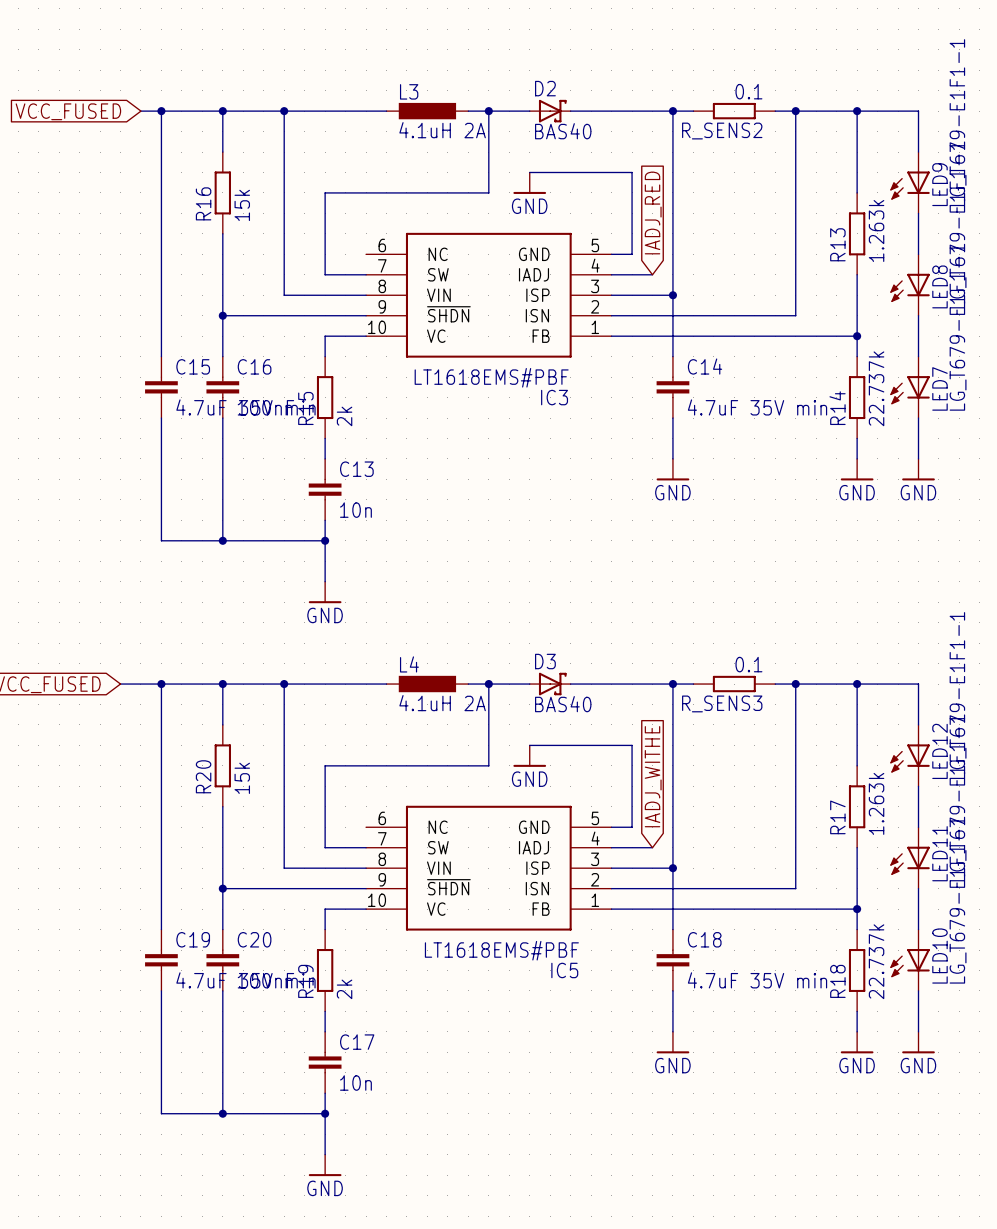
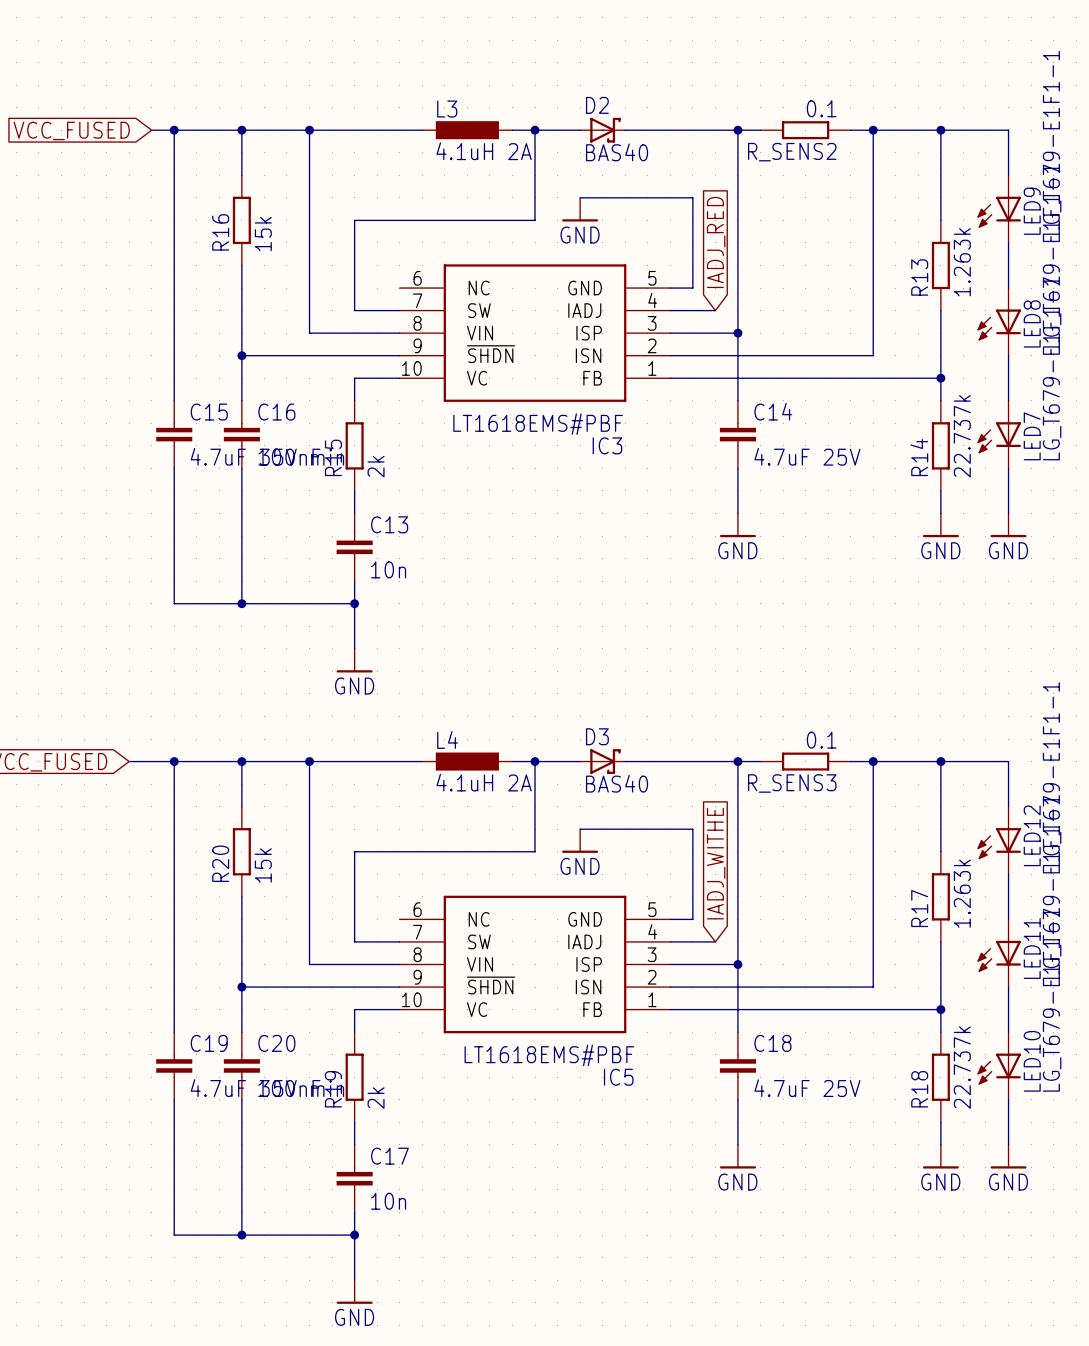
C14 value: 4.7uF 35V min (757, 407) -> 4.7uF 25V (807, 456)
C18 value: 4.7uF 35V min (757, 980) -> 4.7uF 25V (807, 1088)

